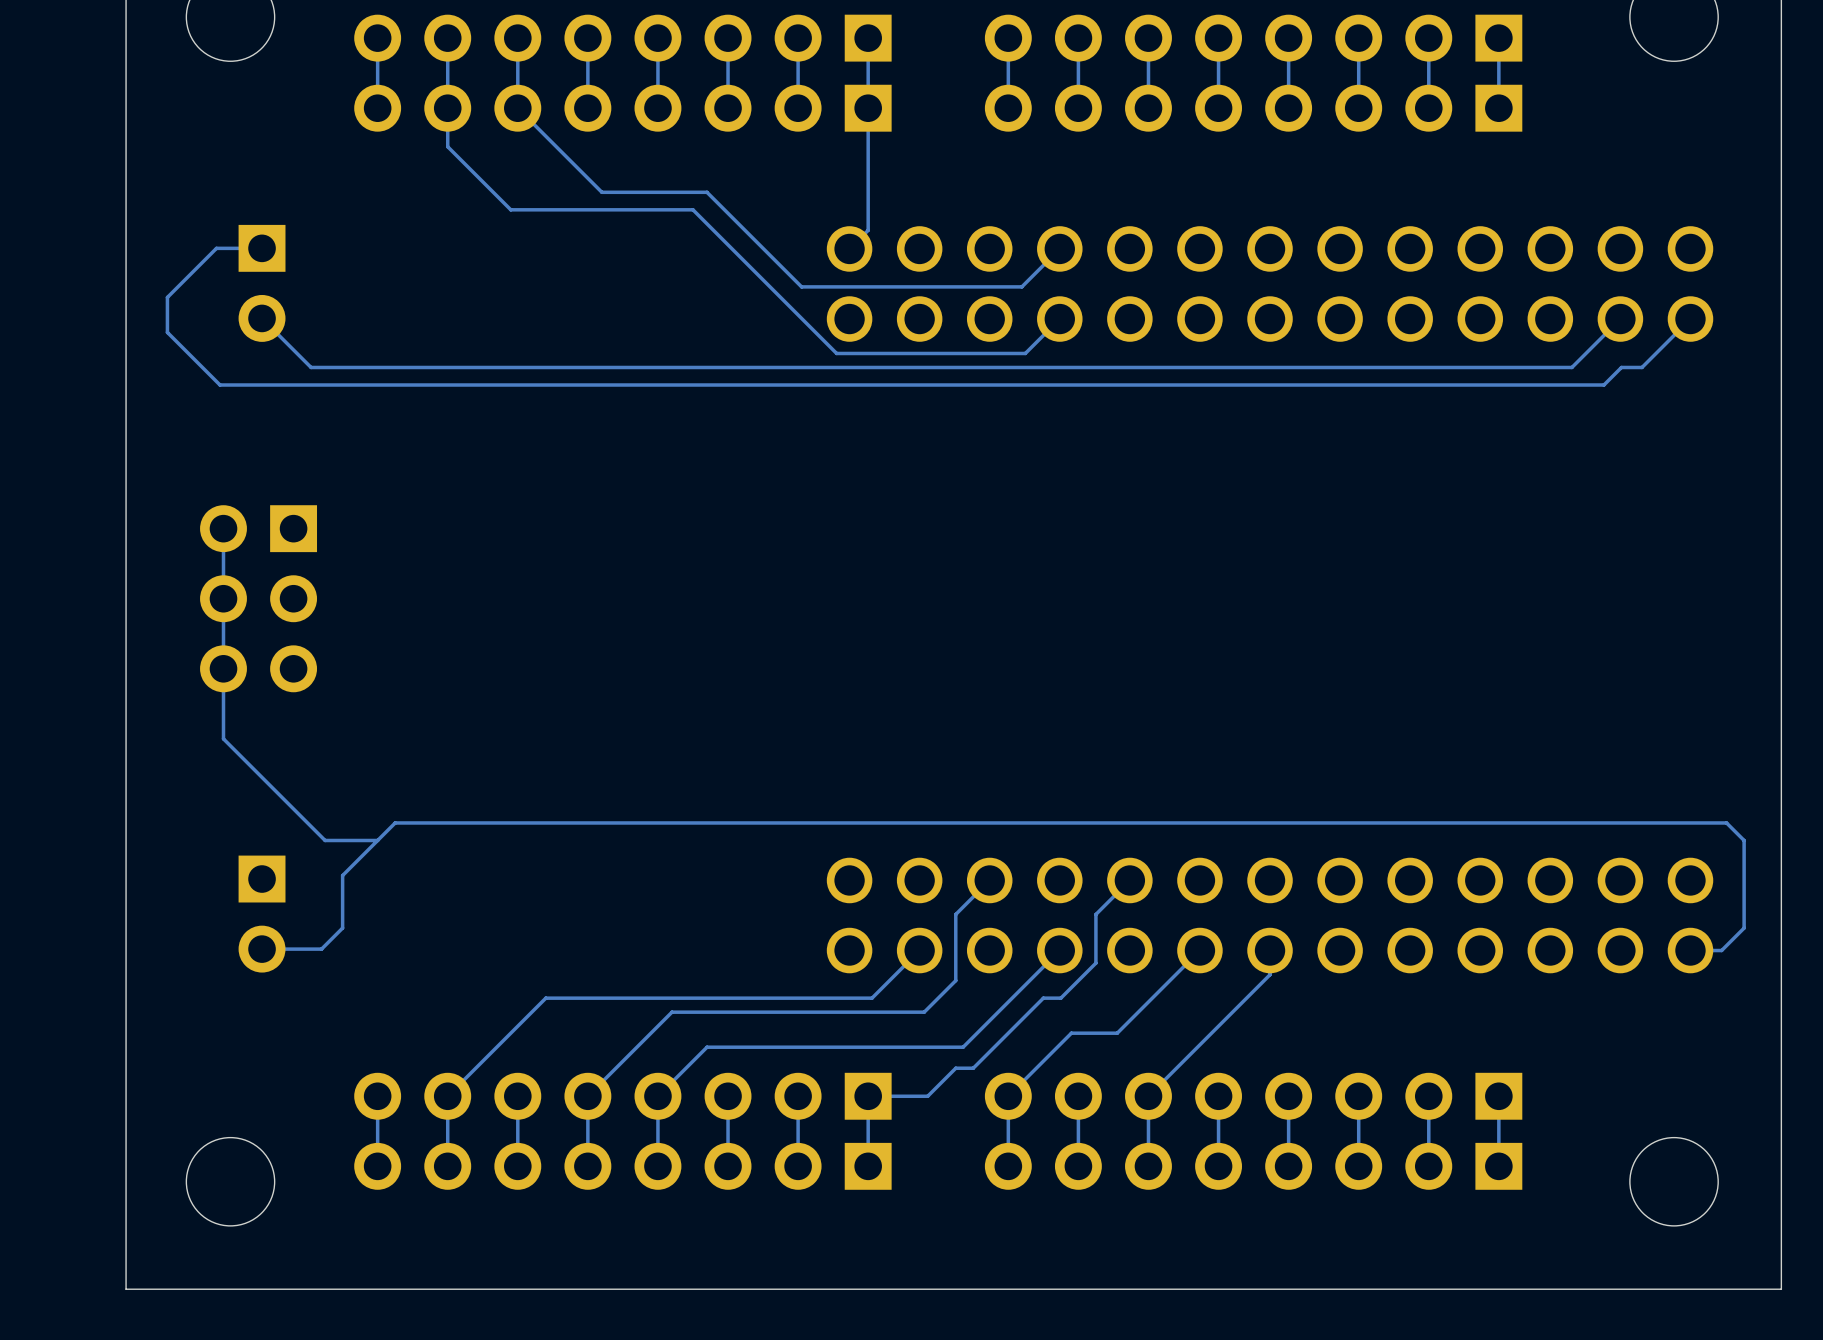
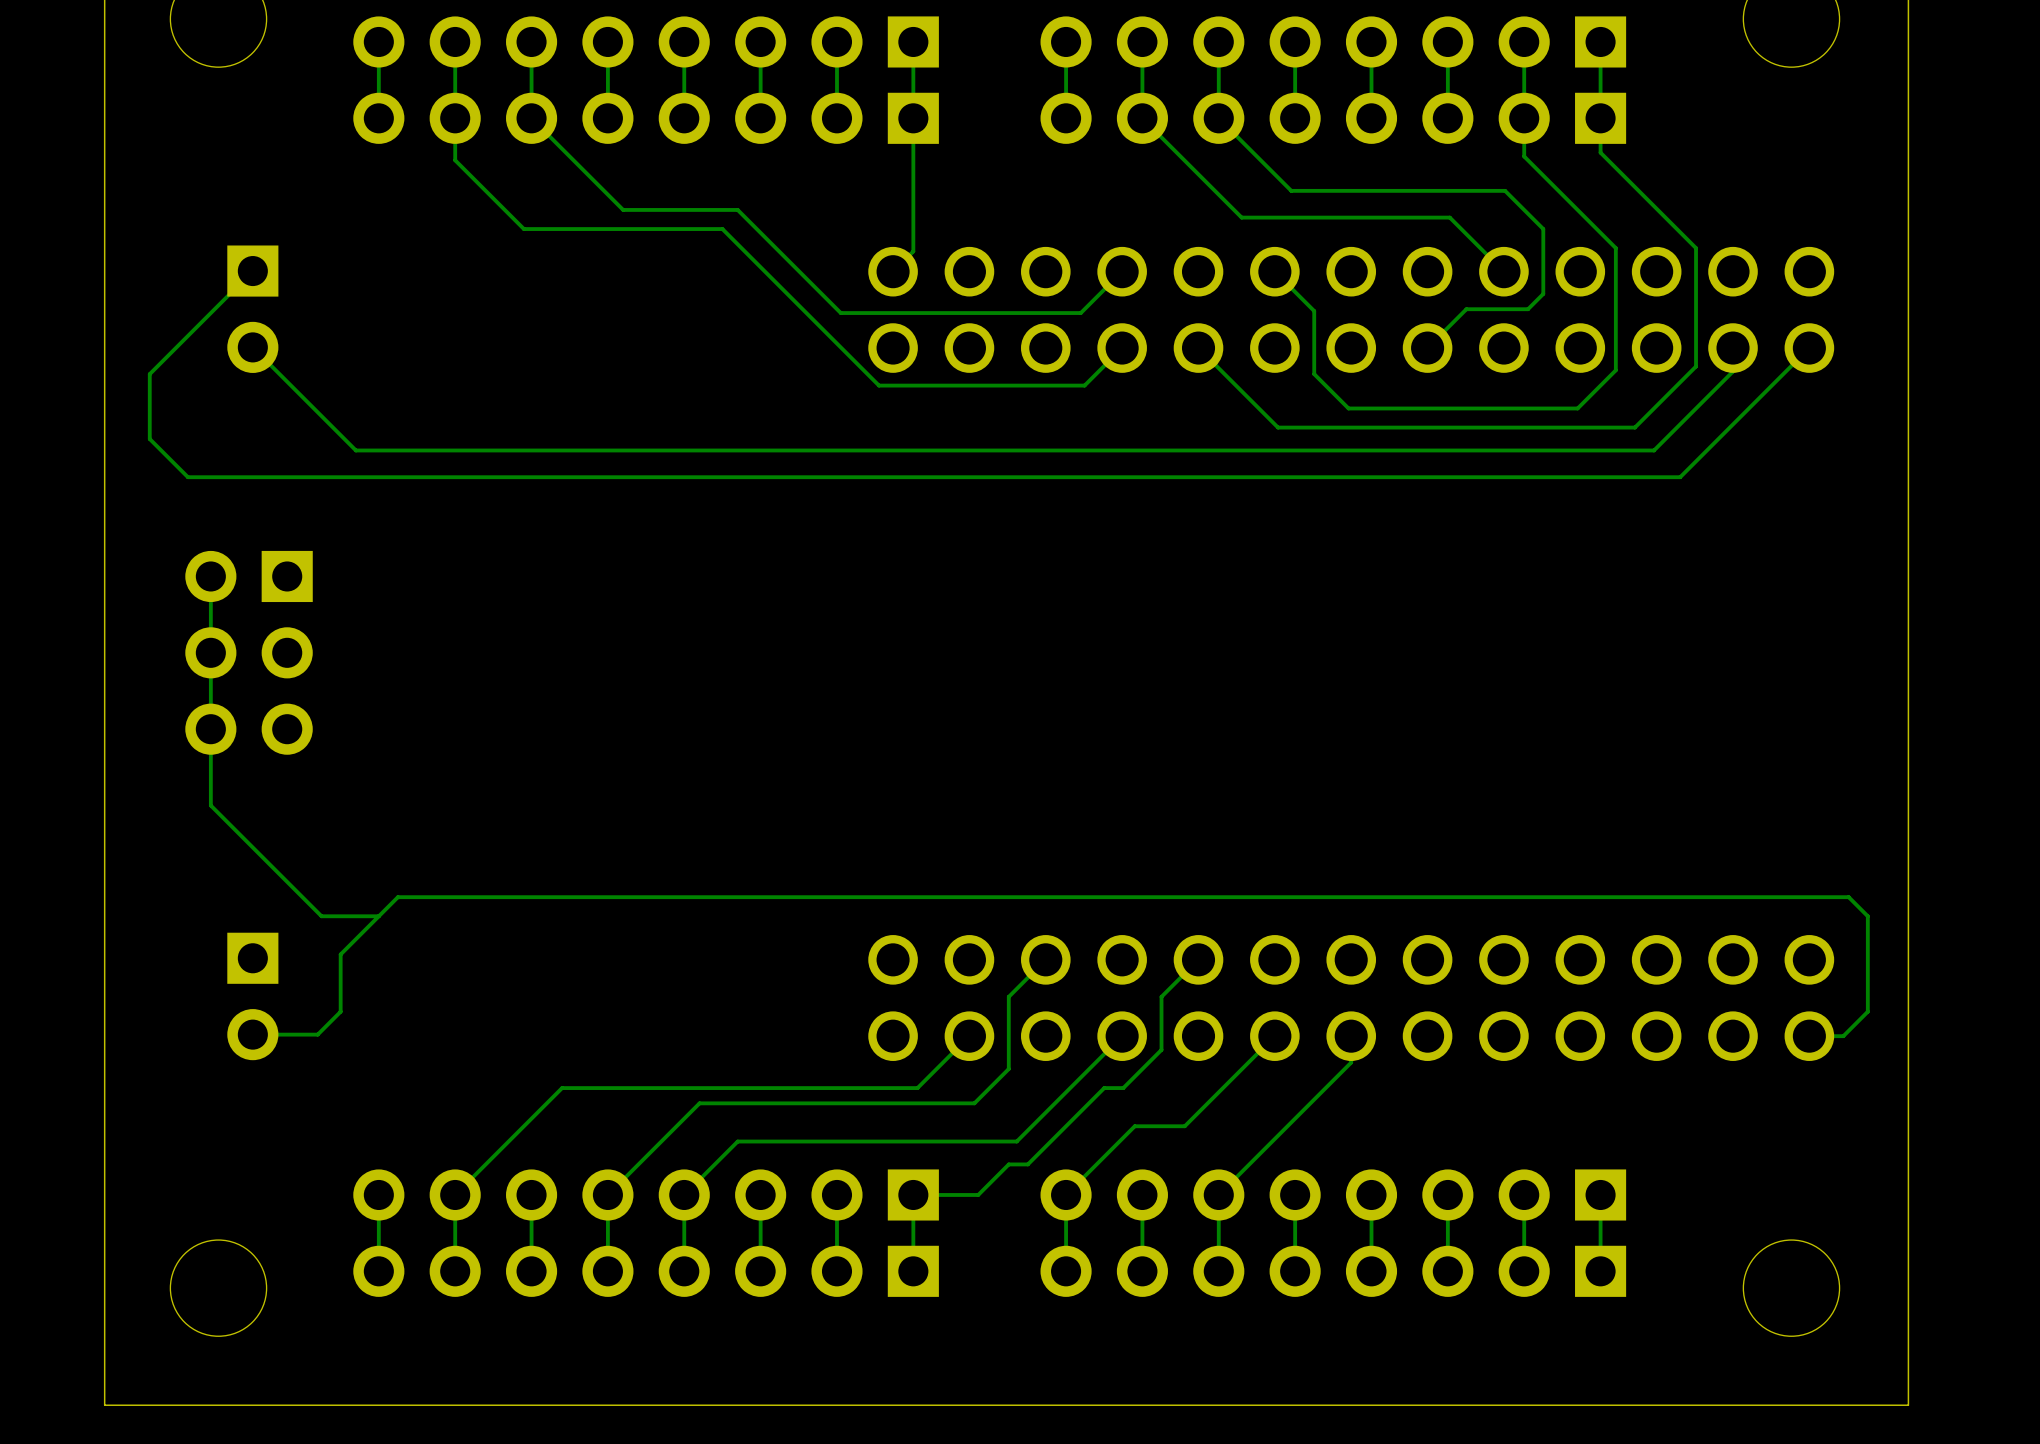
track: none -> (1142, 118) (1241, 217) (1449, 217) (1503, 271)
track: none -> (1218, 118) (1291, 190) (1505, 190) (1543, 229) (1543, 293) (1528, 309) (1466, 309) (1427, 348)
track: none -> (1524, 118) (1524, 156) (1615, 248) (1615, 370) (1577, 408) (1348, 408) (1314, 374) (1314, 311) (1274, 271)
track: none -> (1619, 137) (1600, 118) (1600, 152) (1696, 248) (1696, 366) (1634, 427) (1278, 427) (1198, 348)
track: (262, 248) (216, 248) (167, 297) (167, 332) (219, 385) (1603, 385) (1621, 367) (1642, 367) -> (252, 271) (149, 374) (149, 439) (187, 477) (1680, 477) (1756, 400)
track: (1620, 319) (1571, 367) (311, 367) -> (1733, 348) (1733, 371) (1654, 450) (355, 450) (306, 400)

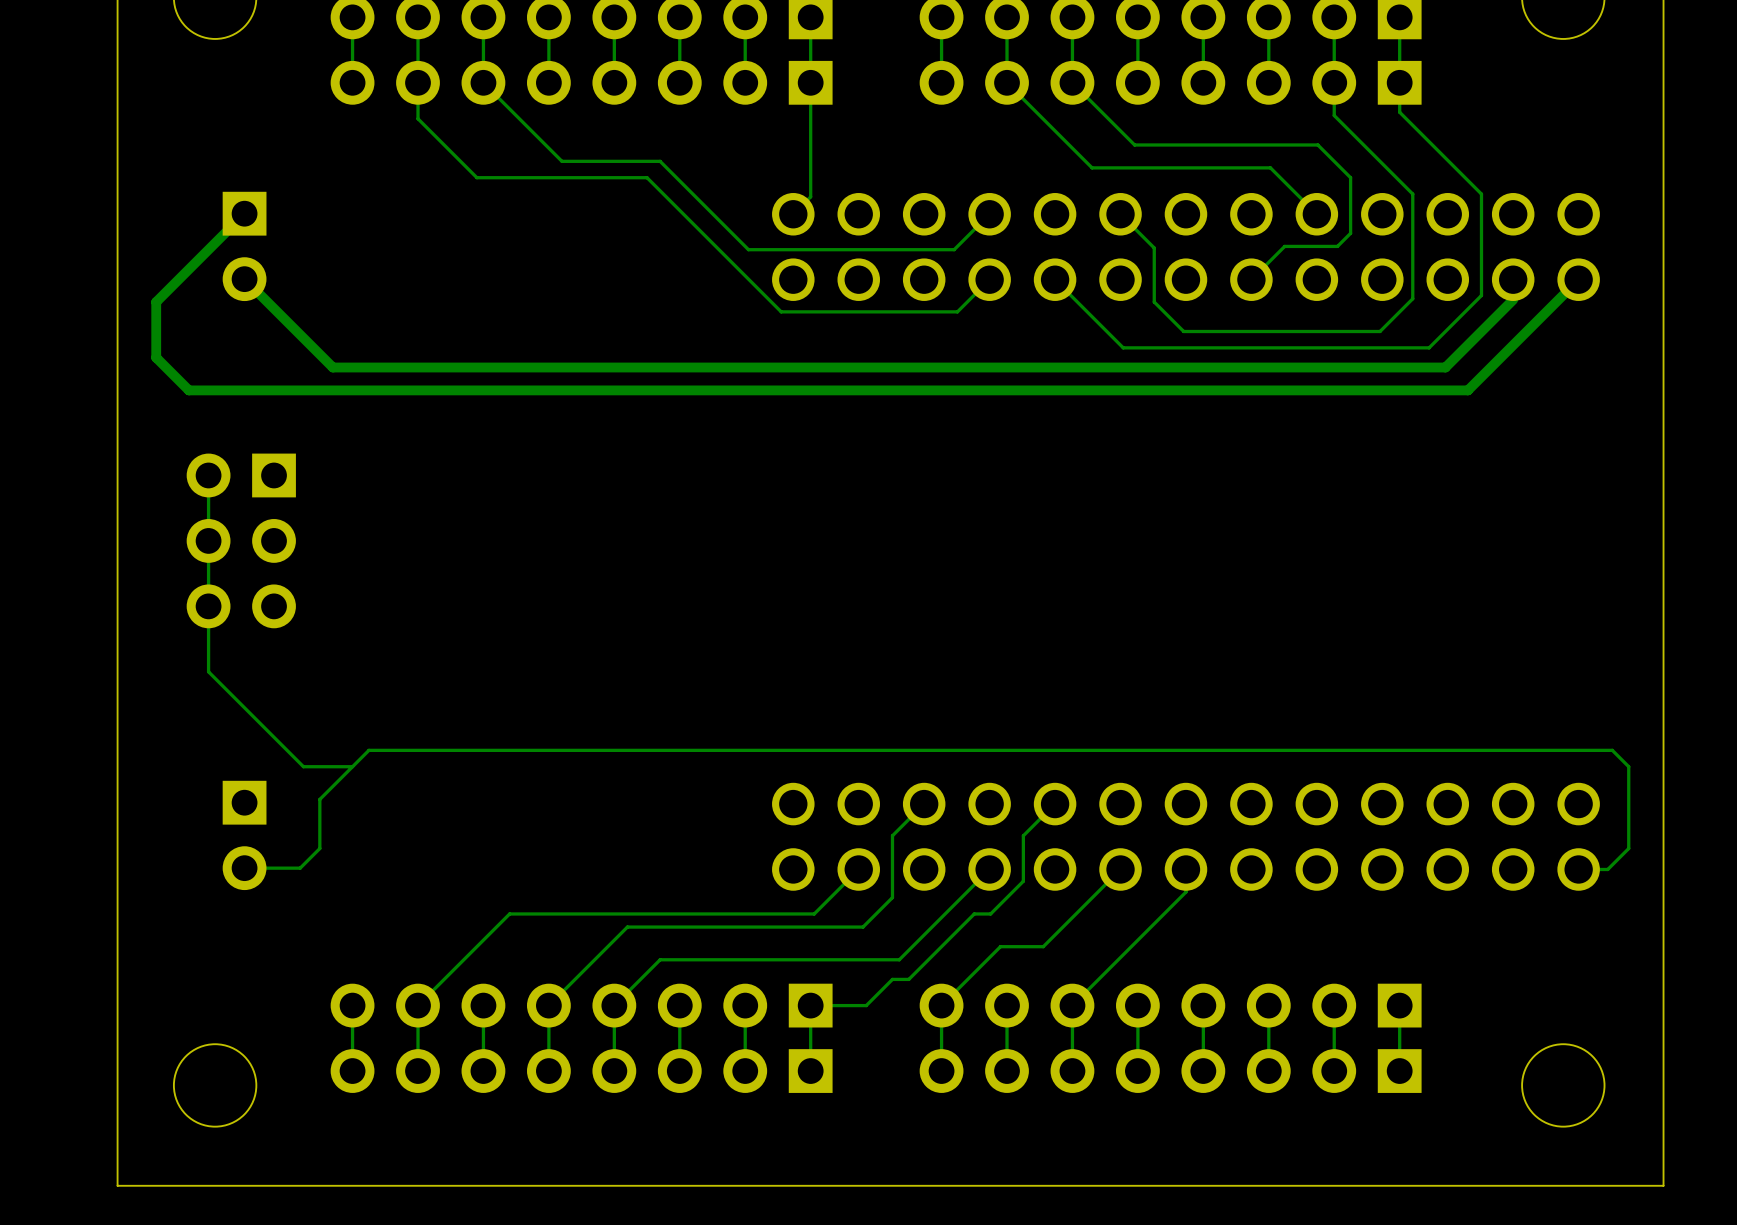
track width: thin (252, 271) (149, 374) (149, 439) (187, 477) (1680, 477) (1809, 348) -> thick (244, 213) (156, 302) (156, 357) (188, 390) (1467, 390) (1578, 279)
track width: thin (252, 347) (355, 450) (1654, 450) (1733, 371) (1733, 348) -> thick (244, 279) (332, 367) (1445, 367) (1513, 299) (1513, 279)

